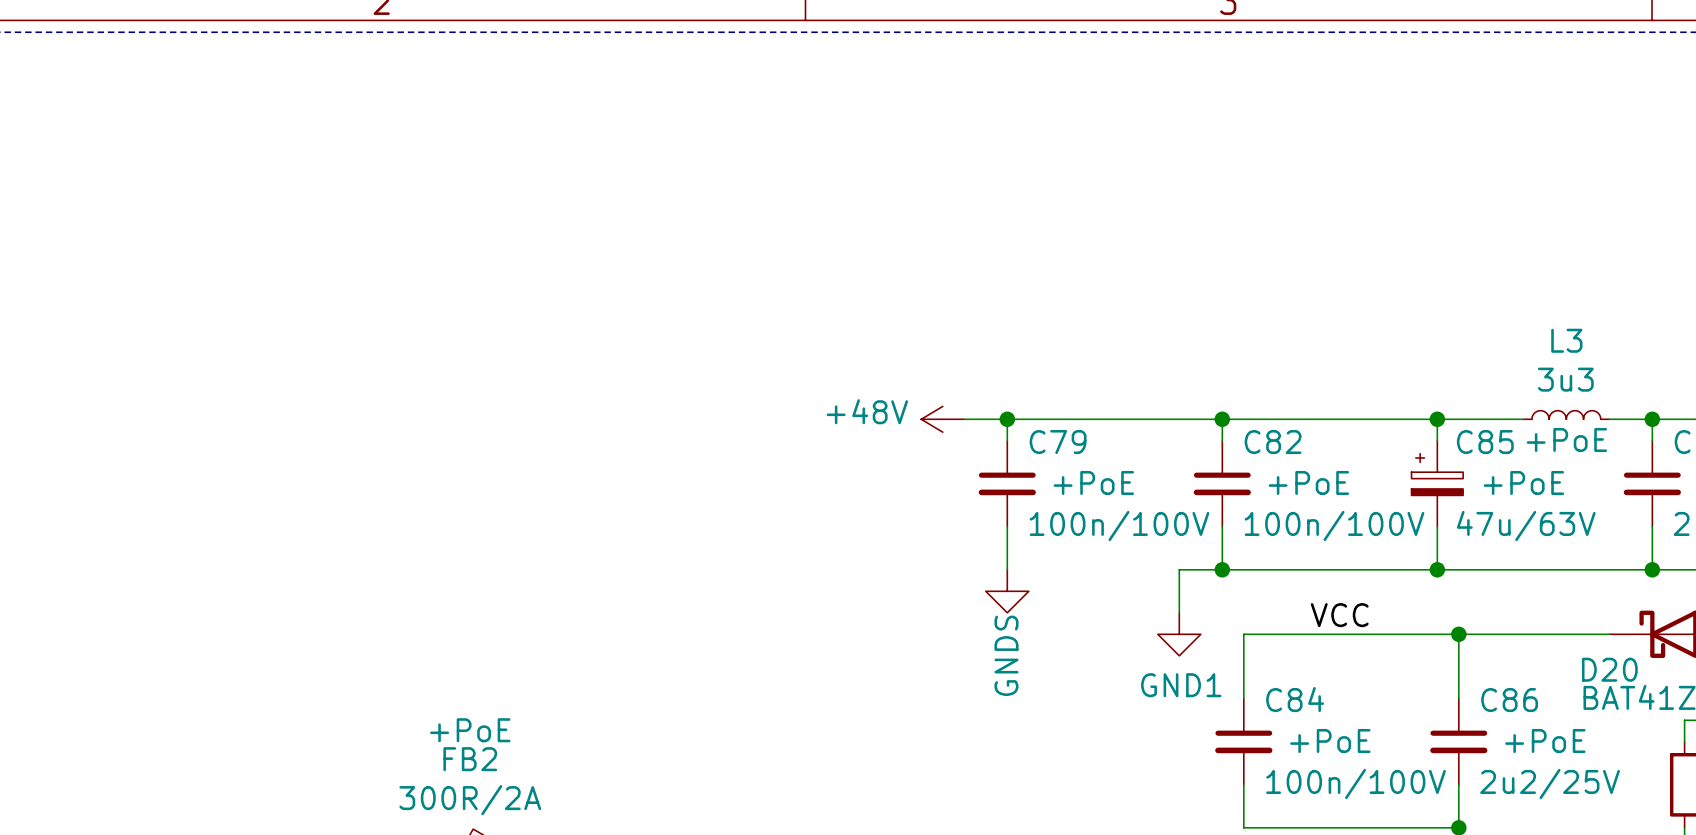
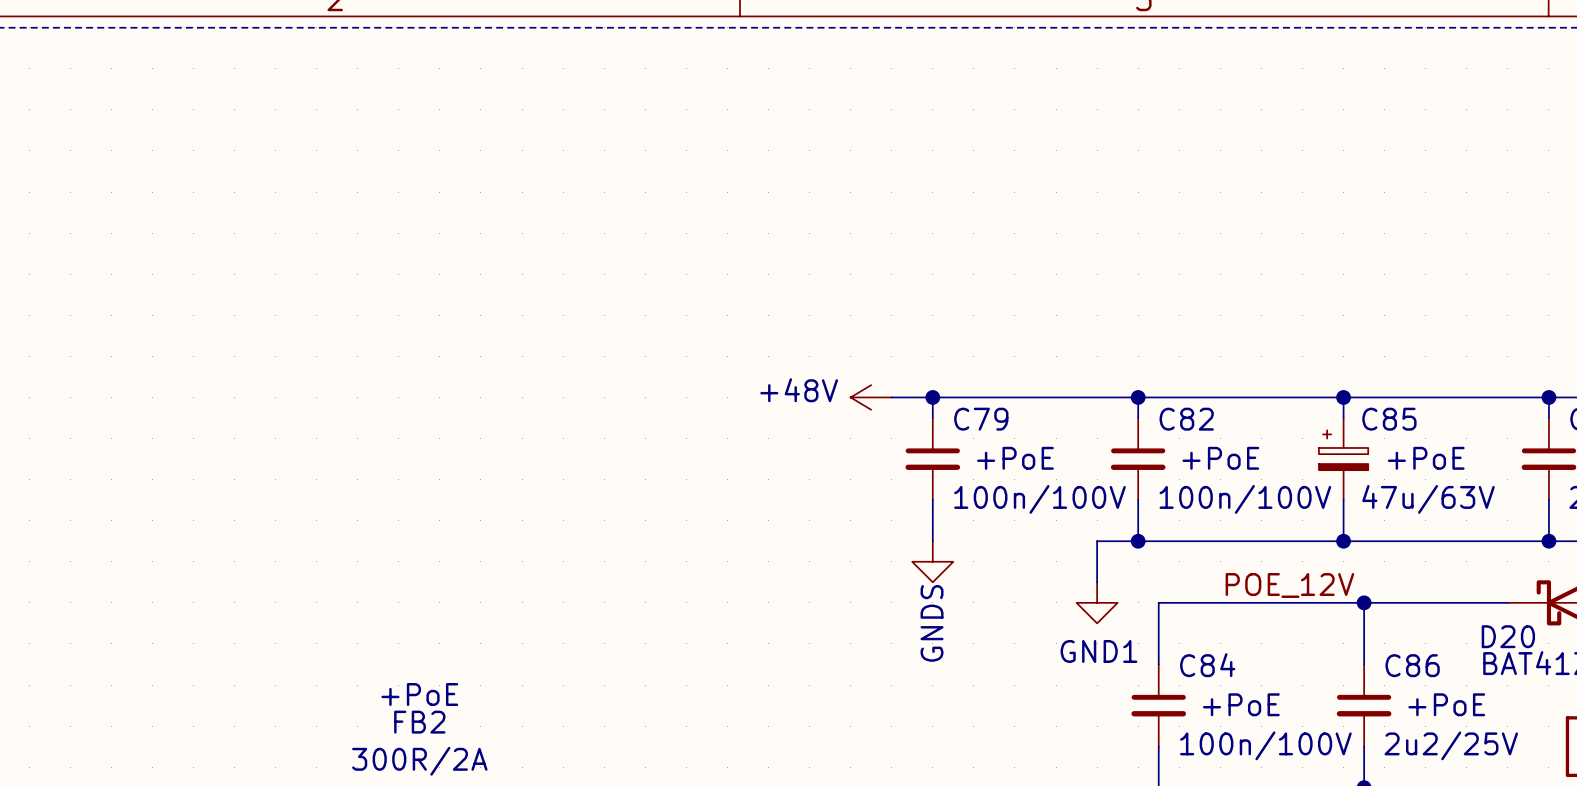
L3: 3u3 (1566, 414) -> none
wire: none -> (1425, 397) (1507, 397)
label: VCC (1339, 615) -> POE_12V (1289, 585)

